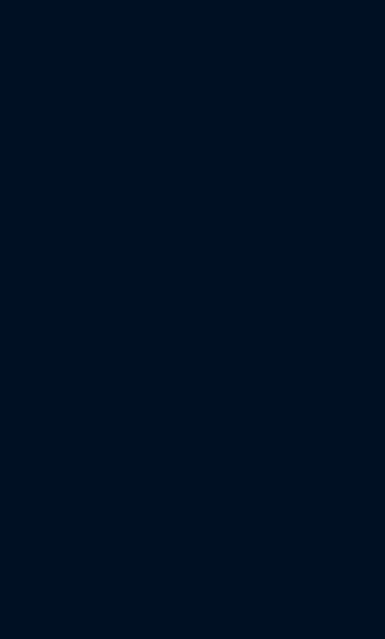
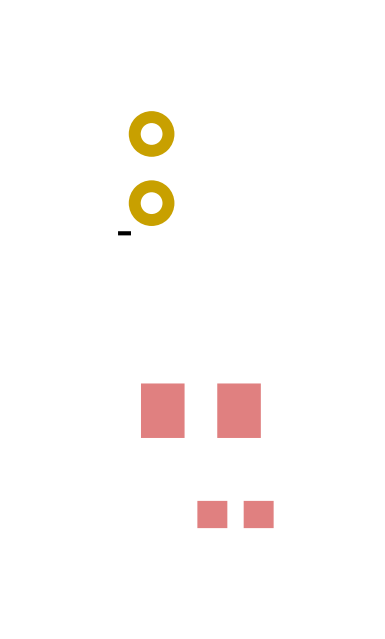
part: none -> (151, 168)
part: none -> (200, 410)
part: none -> (235, 514)

